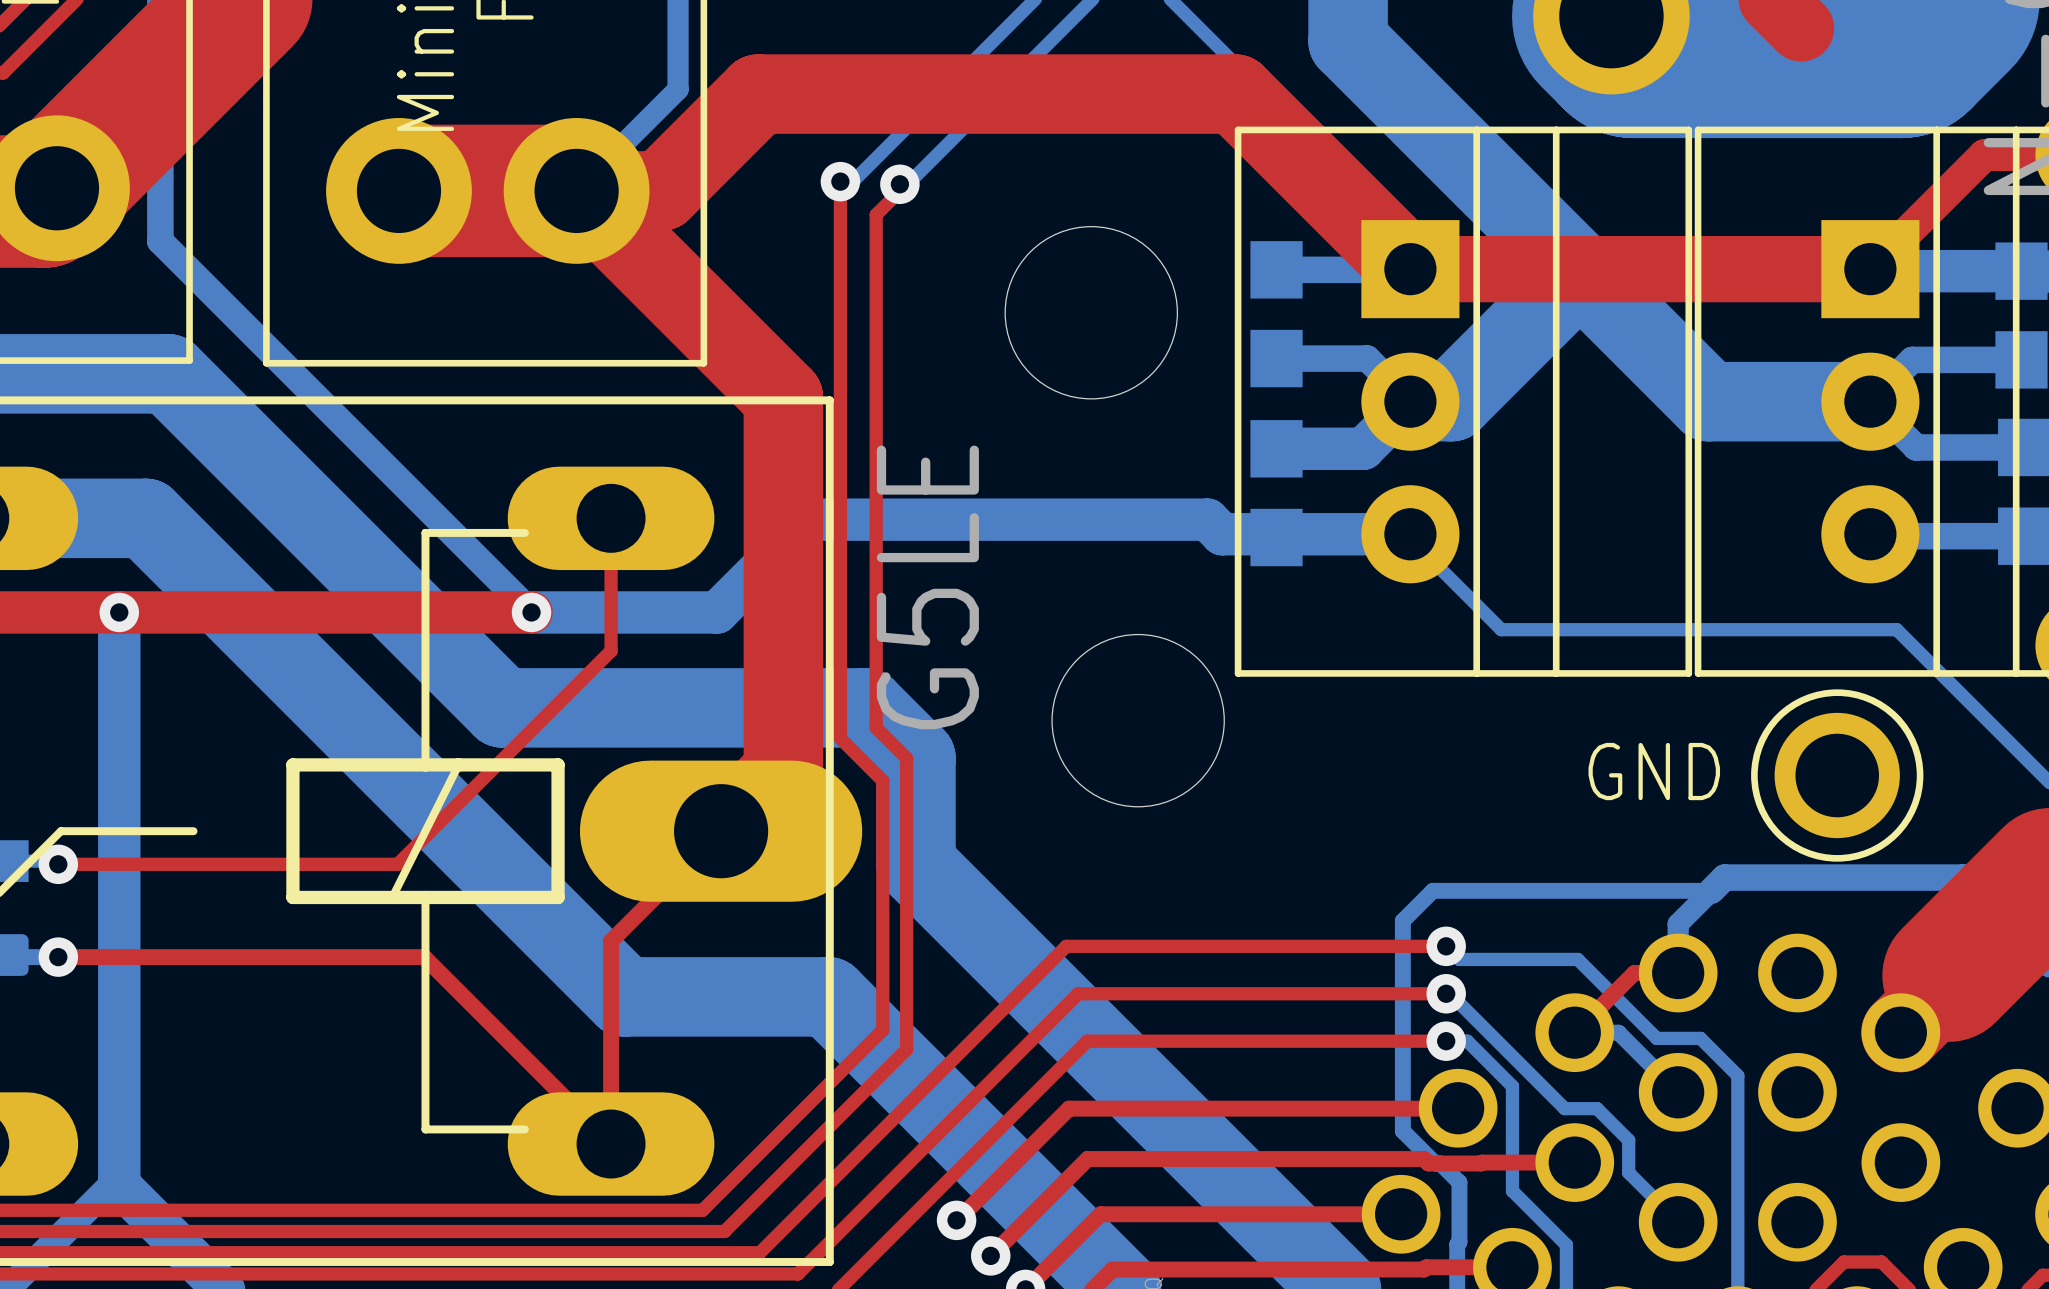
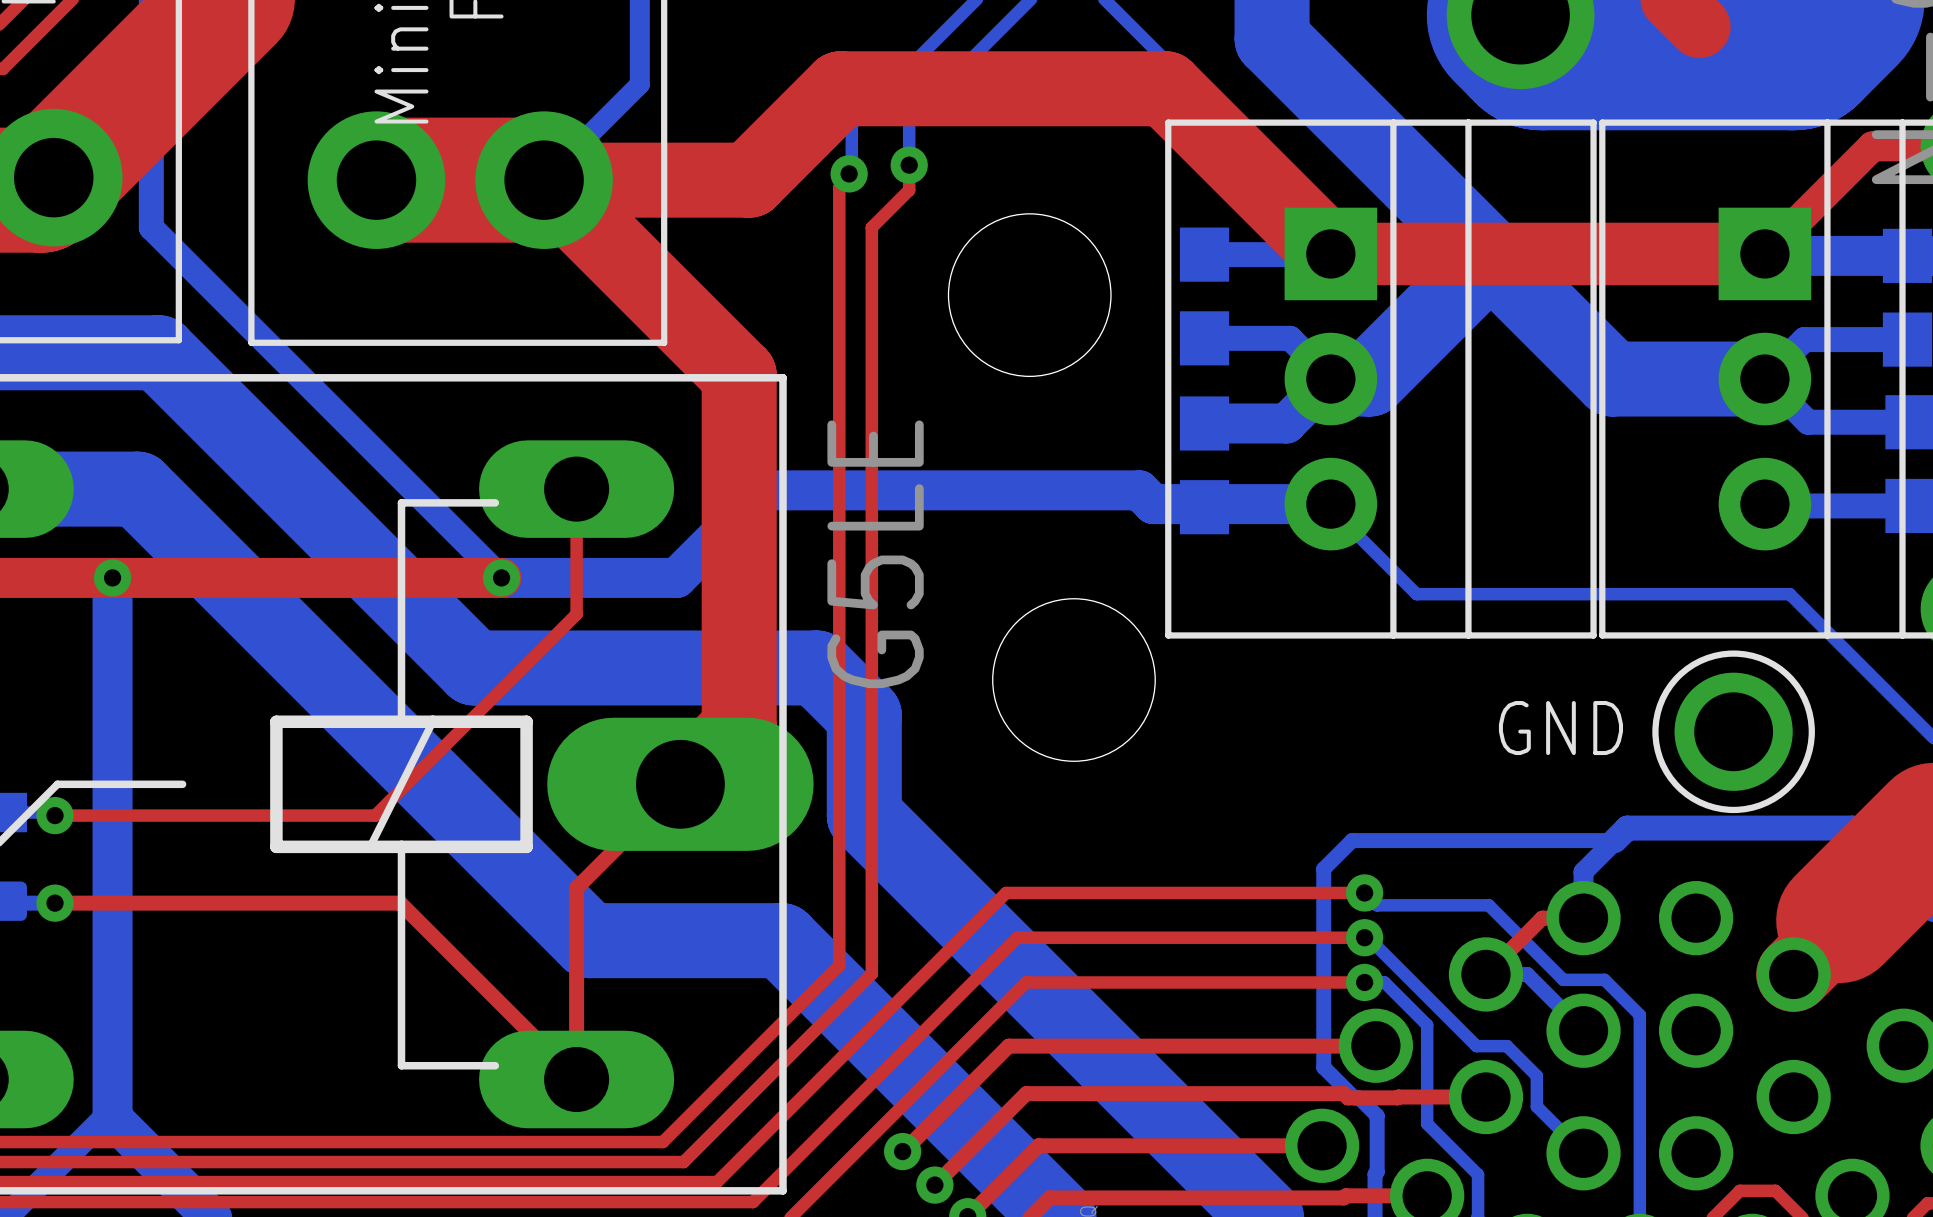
top track: (890, 94) (758, 94) (661, 190) -> (840, 88) (749, 180) (624, 180)
bottom track: (963, 128) (907, 184) (899, 184) -> (909, 121) (909, 165)
bottom track: (902, 131) (852, 181) (840, 181) -> (851, 124) (851, 175)
top track: (840, 181) (840, 738) (882, 780) (882, 1030) -> (851, 175) (839, 187) (839, 965) (833, 971)
via position: (840, 181) -> (909, 165)
top track: (899, 184) (899, 191) (876, 214) (876, 727) (906, 758) (906, 1049) -> (909, 165) (909, 190) (871, 227) (871, 973) (855, 990)

